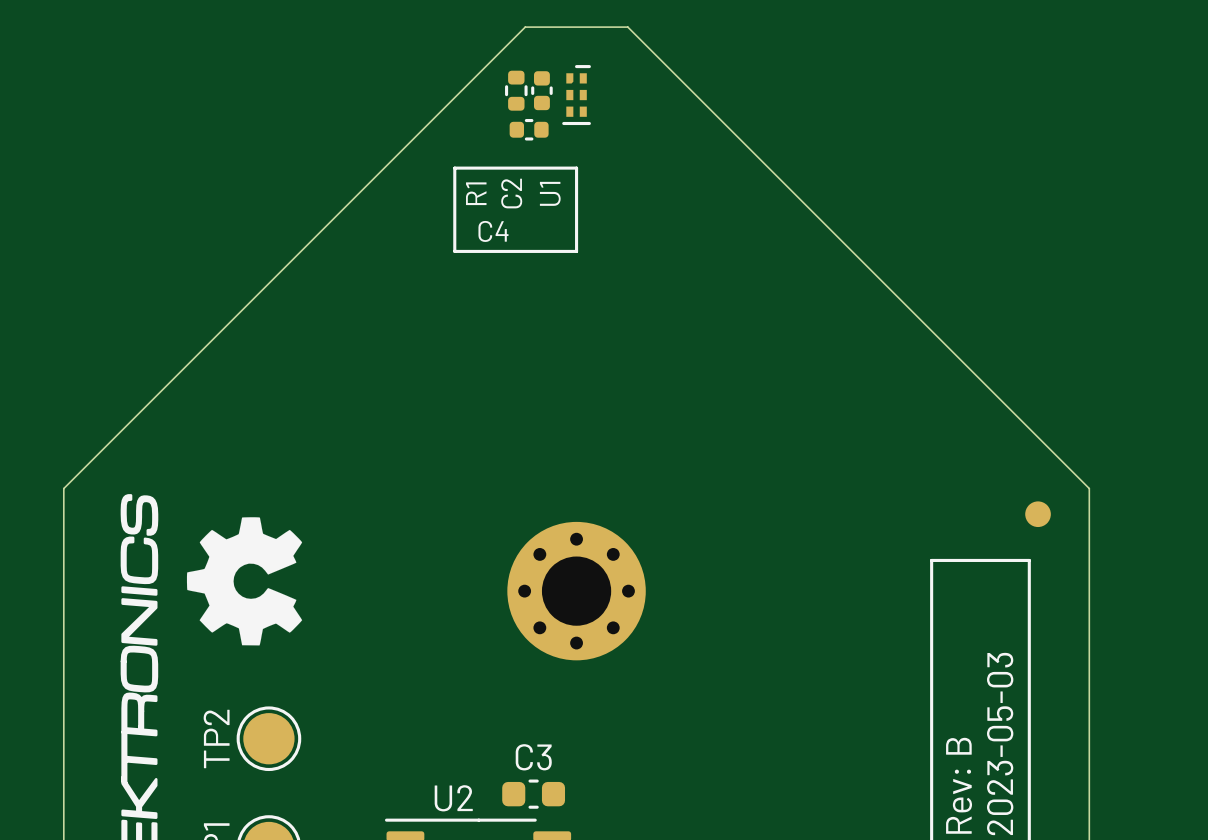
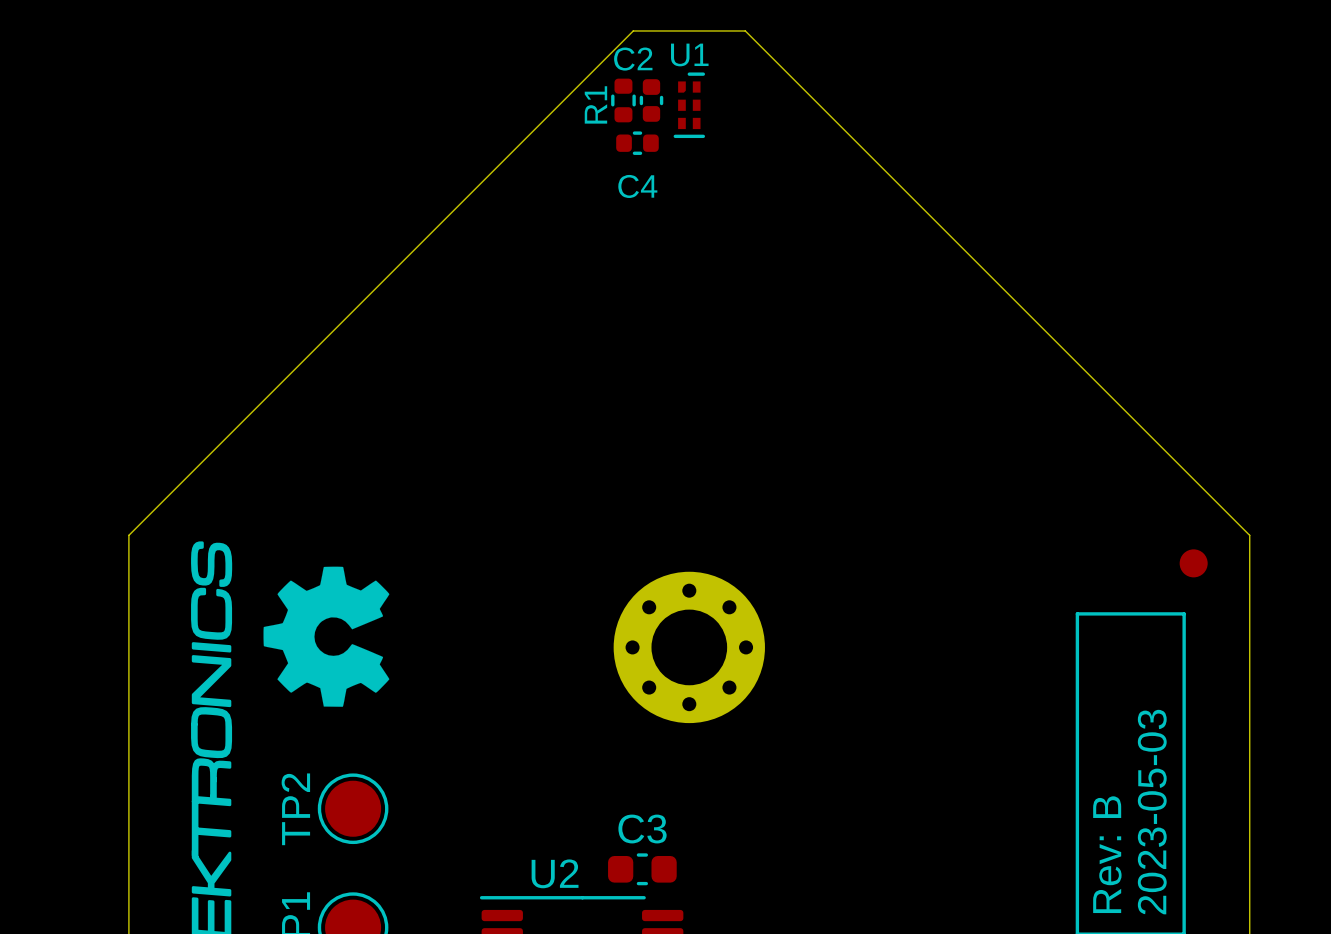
line: (454, 168) (576, 168) (576, 251) (454, 251) (454, 168) -> none
R1 name position: R1 (476, 193) -> R1 (595, 104)
C2 name rotation: 0° (511, 193) -> 90° clockwise (633, 59)
C2 name position: C2 (511, 193) -> C2 (633, 59)
U1 name rotation: 0° (550, 193) -> 90° clockwise (689, 54)
U1 name position: U1 (550, 193) -> U1 (689, 54)
C4 name position: C4 (493, 231) -> C4 (637, 186)

